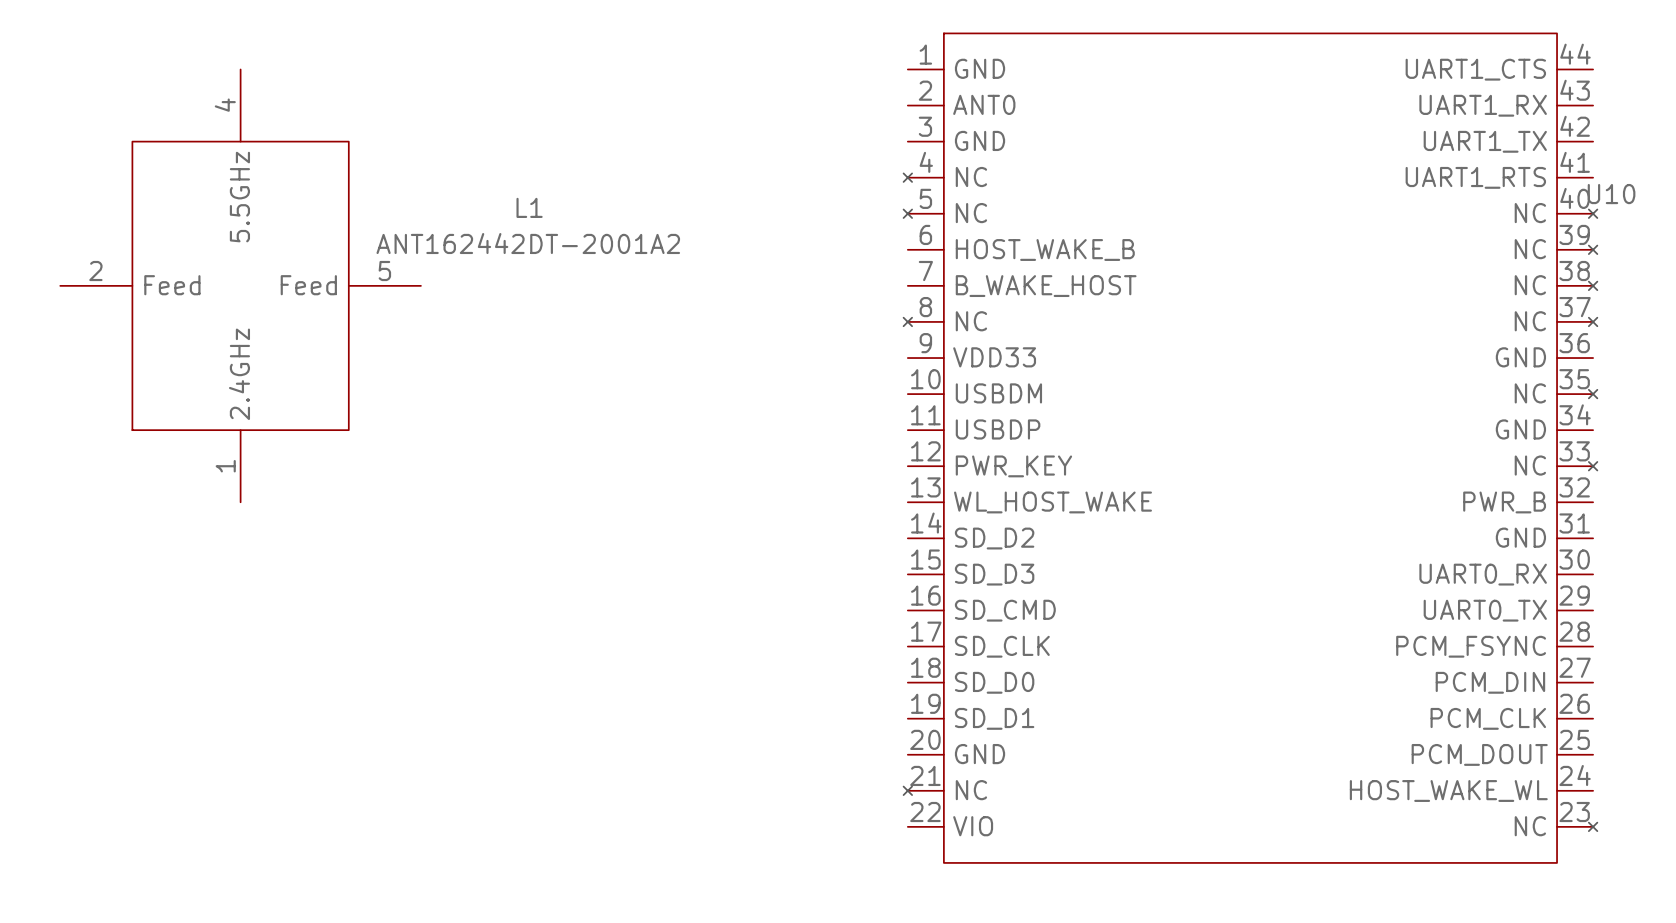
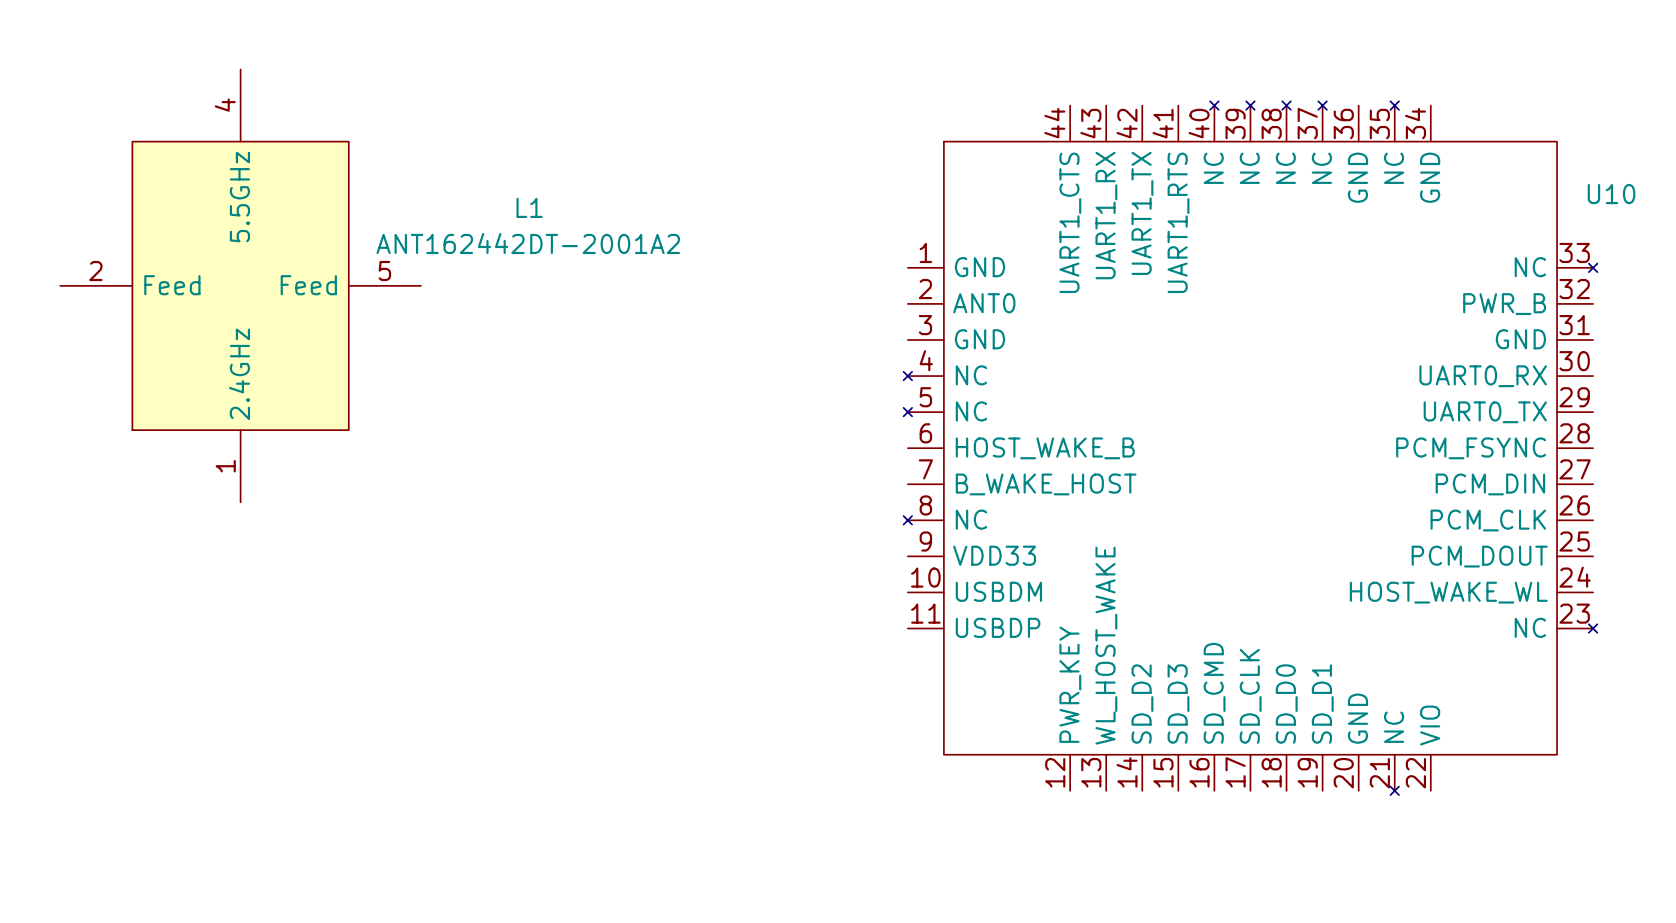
U10 symbol: [903, 33, 1598, 863] -> [903, 101, 1598, 796]

